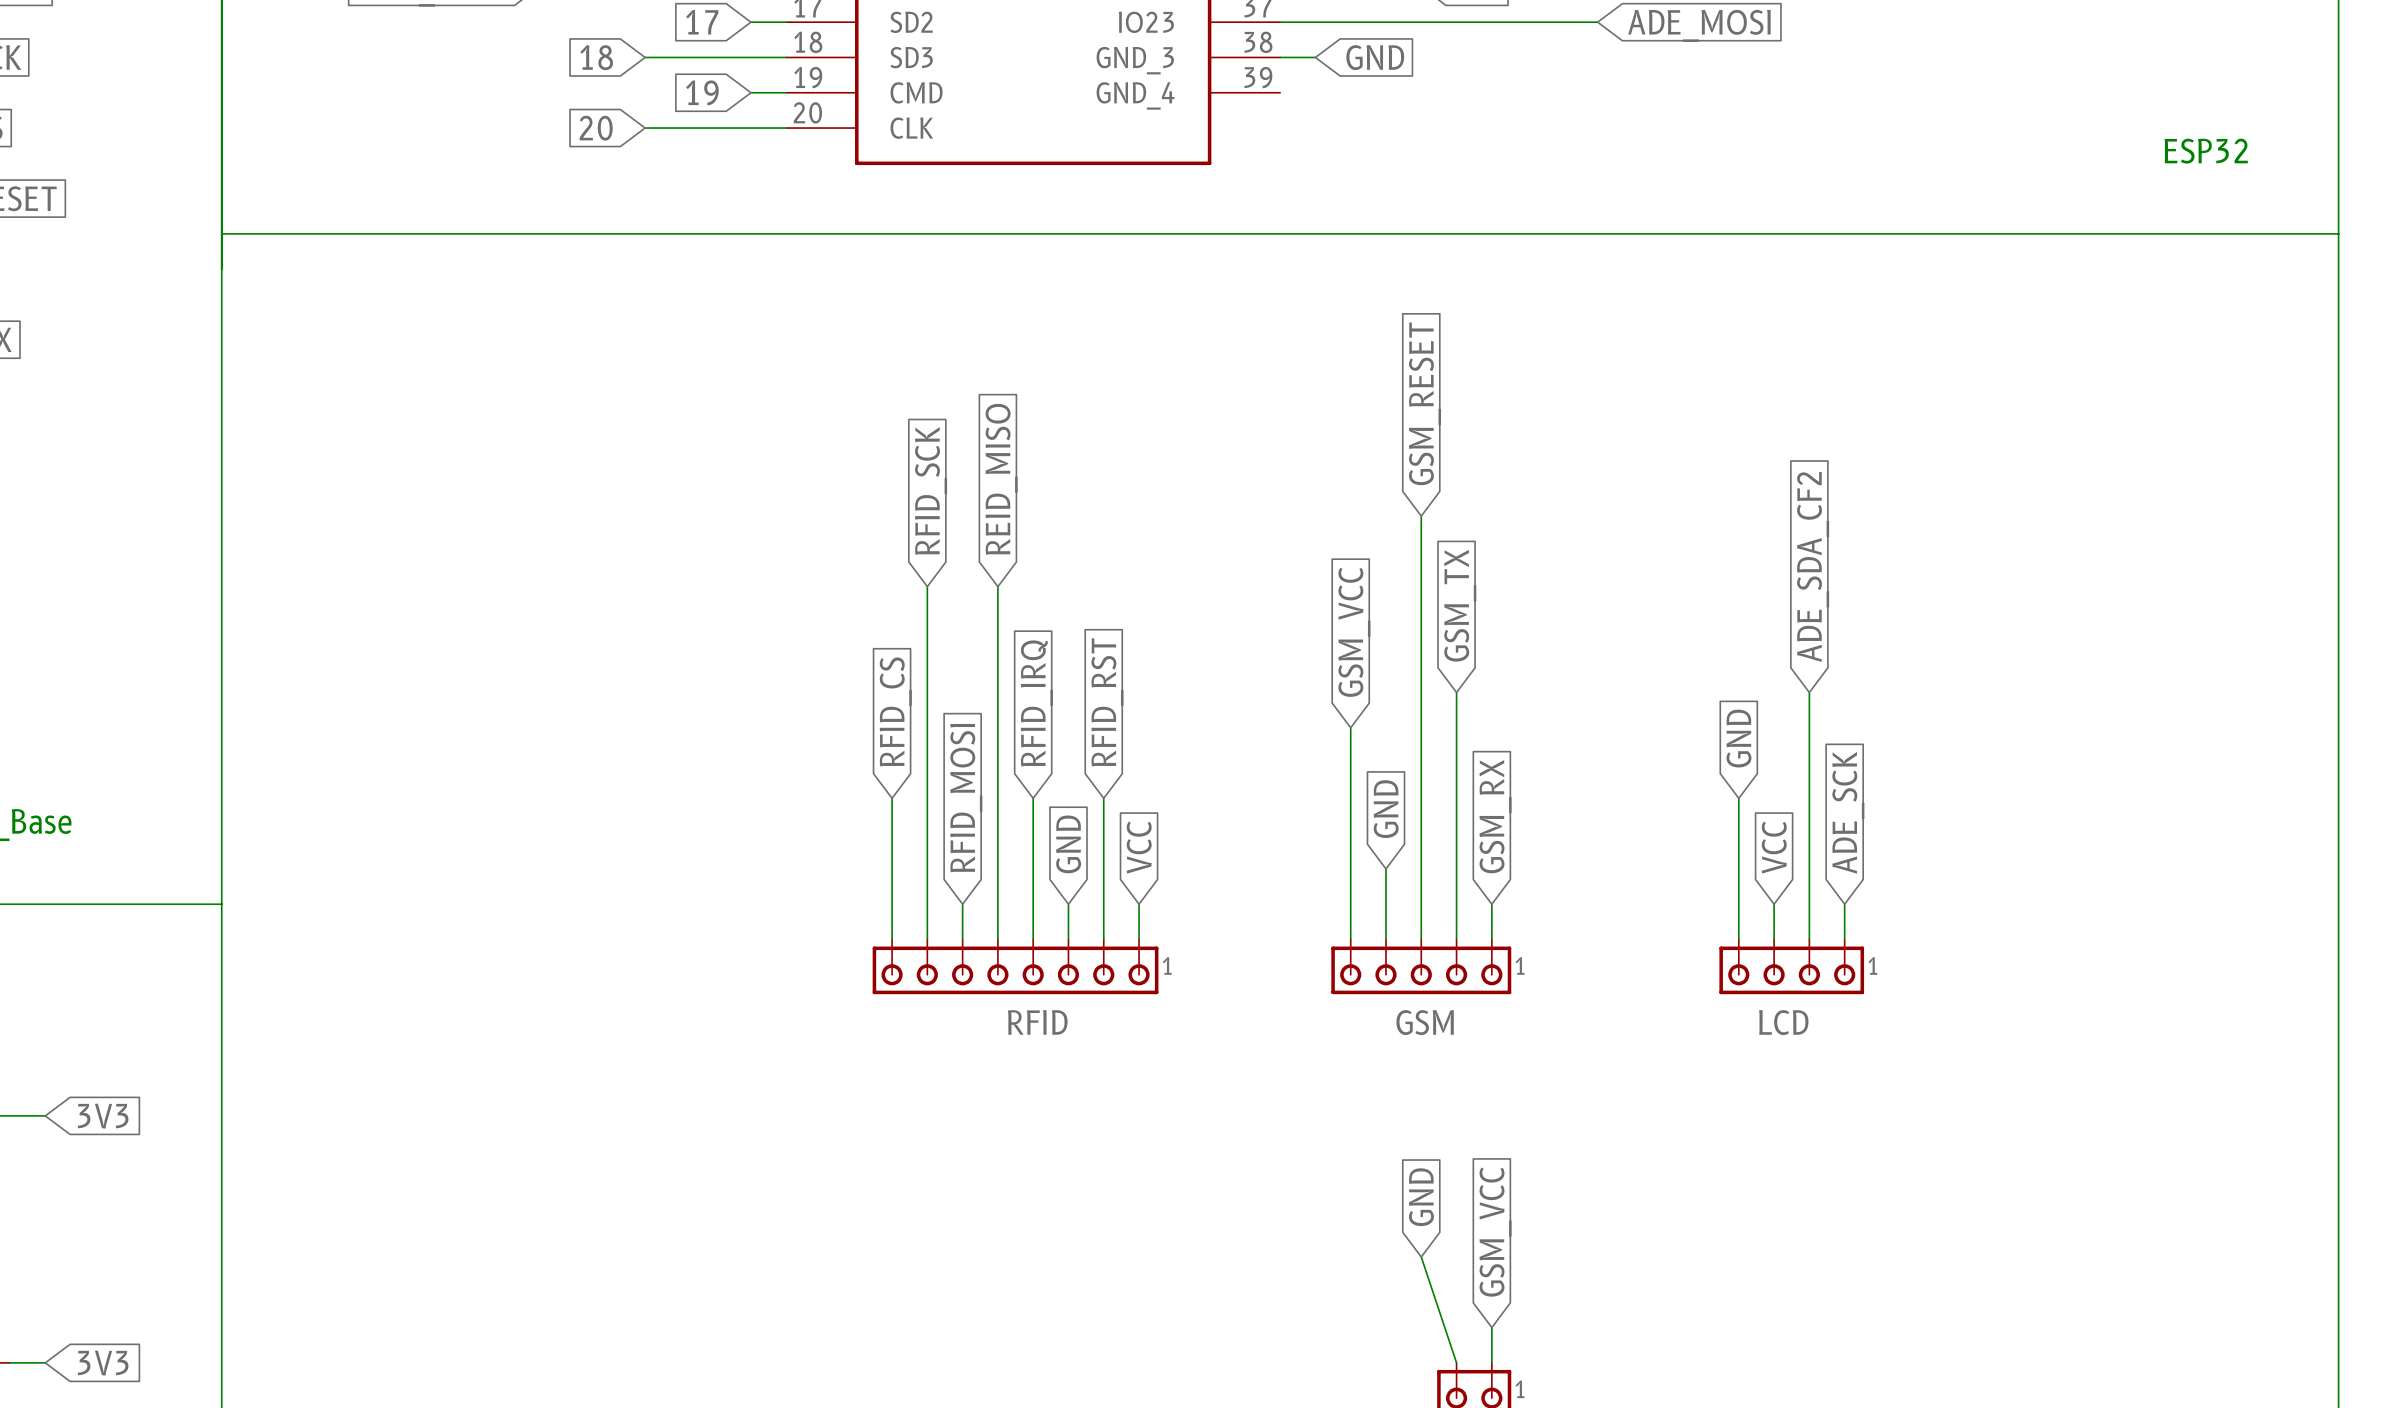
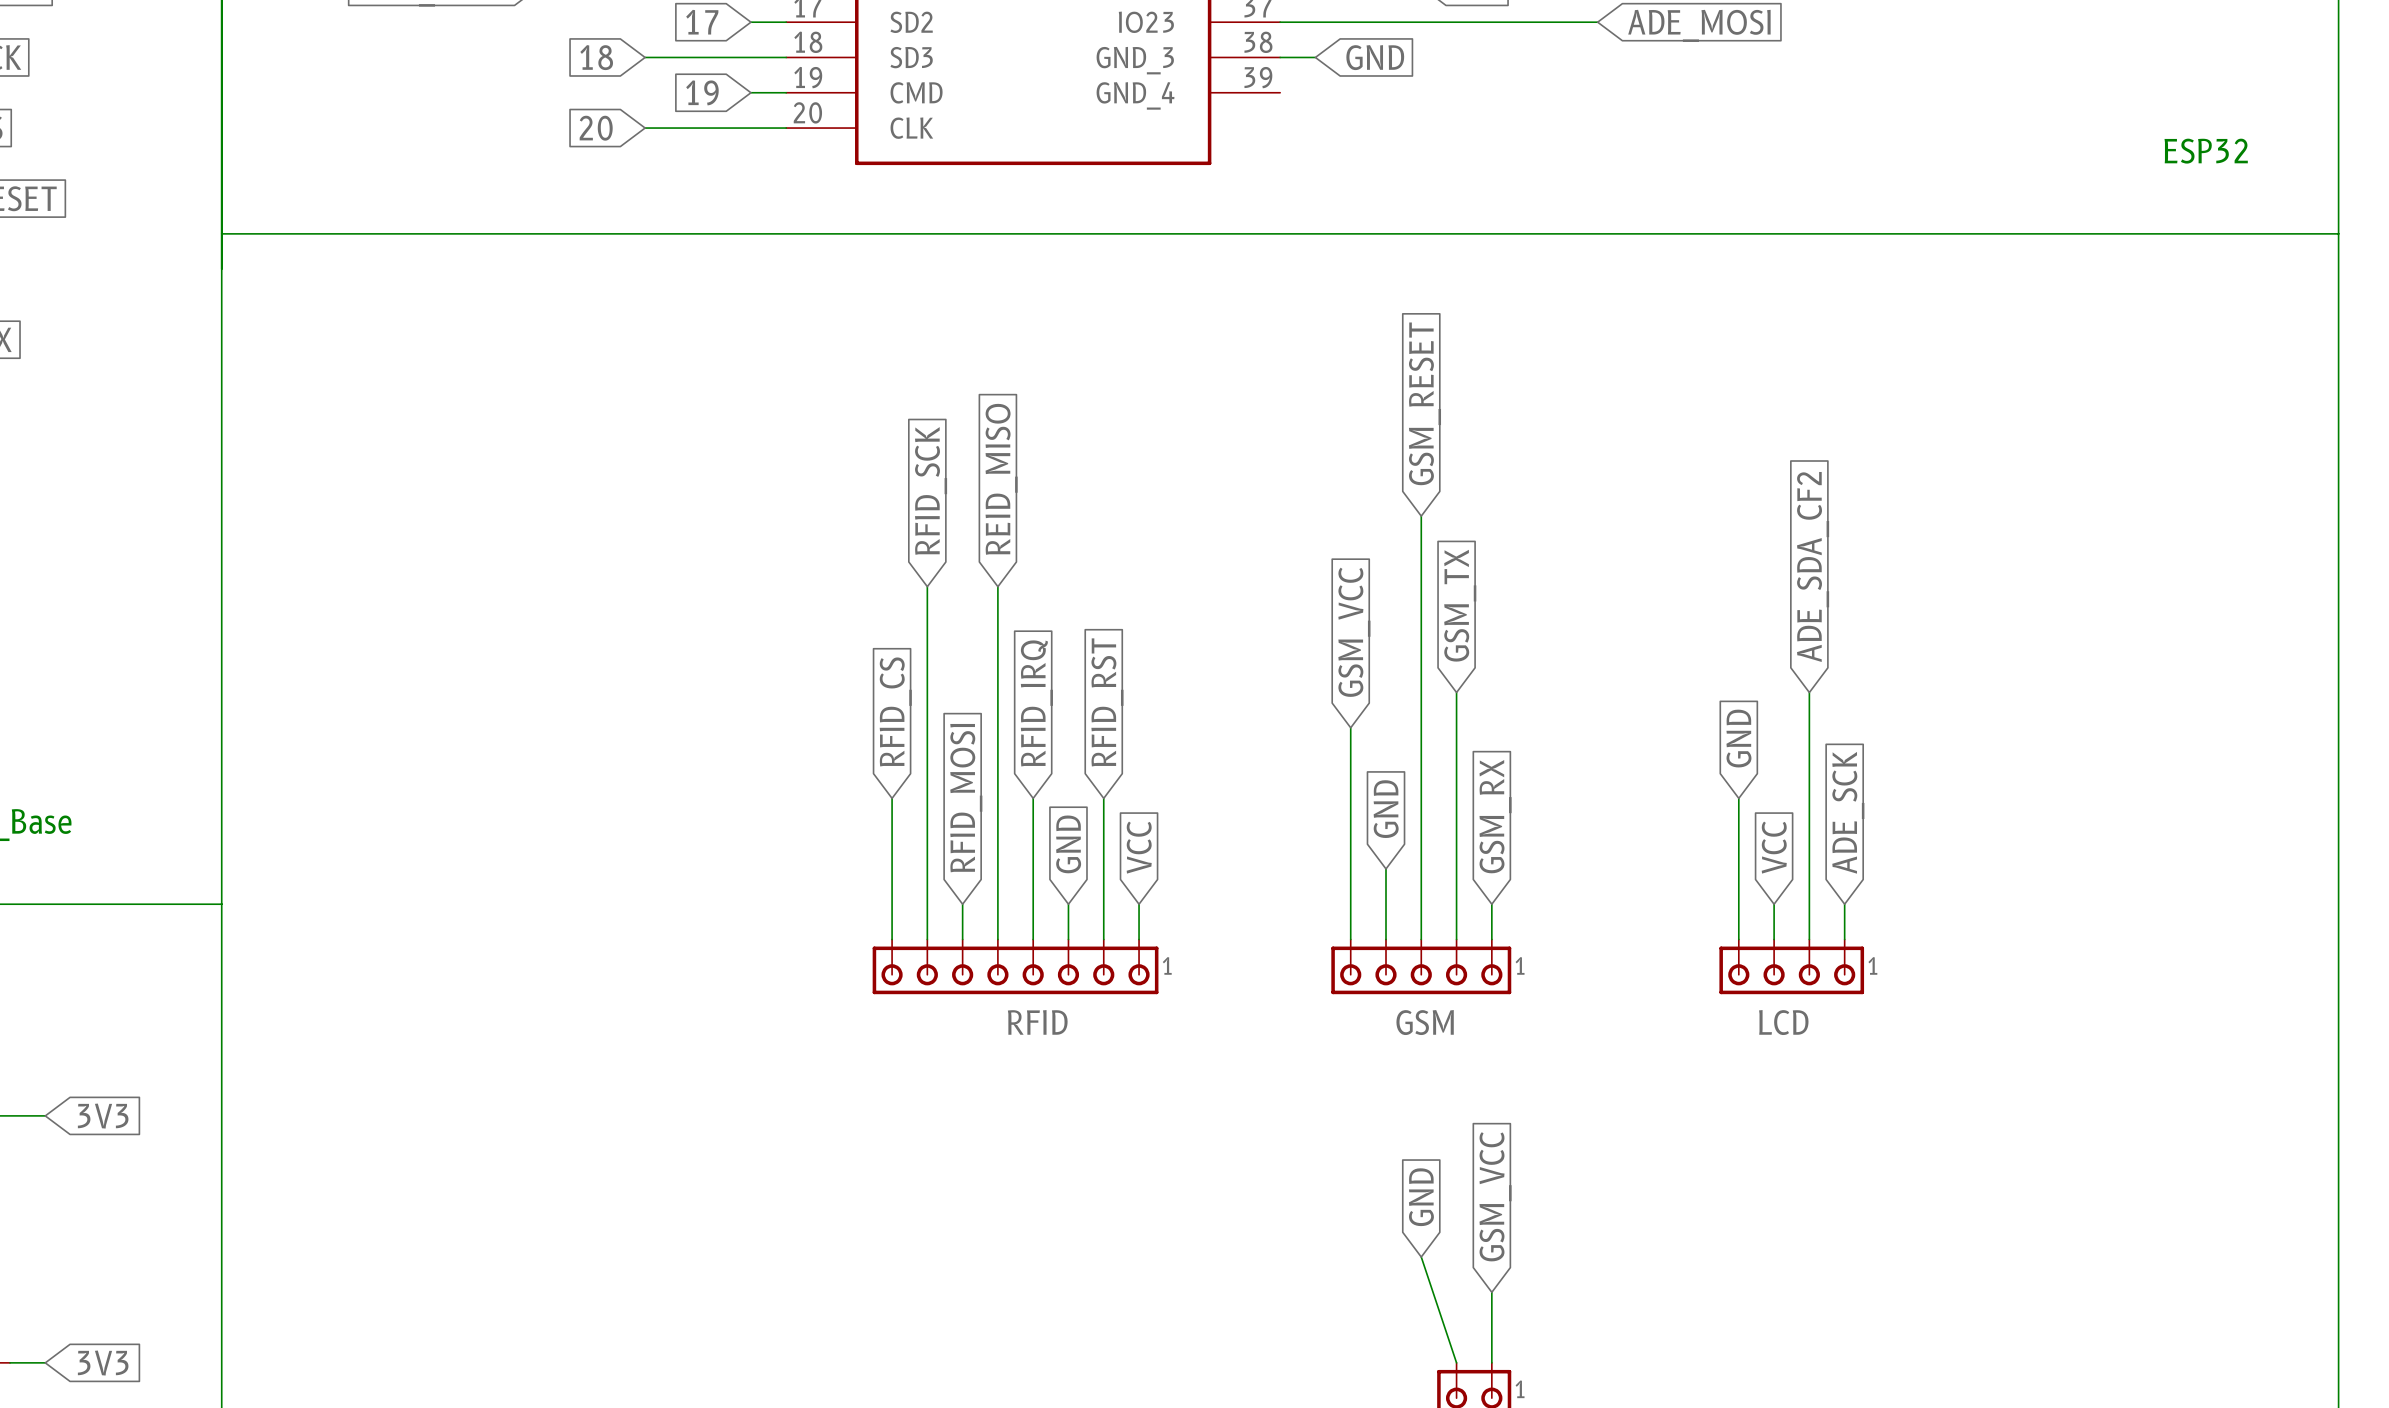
global label position: GSM_VCC (1495, 1232) -> GSM_VCC (1495, 1196)
wire: none -> (1491, 1292) (1491, 1327)

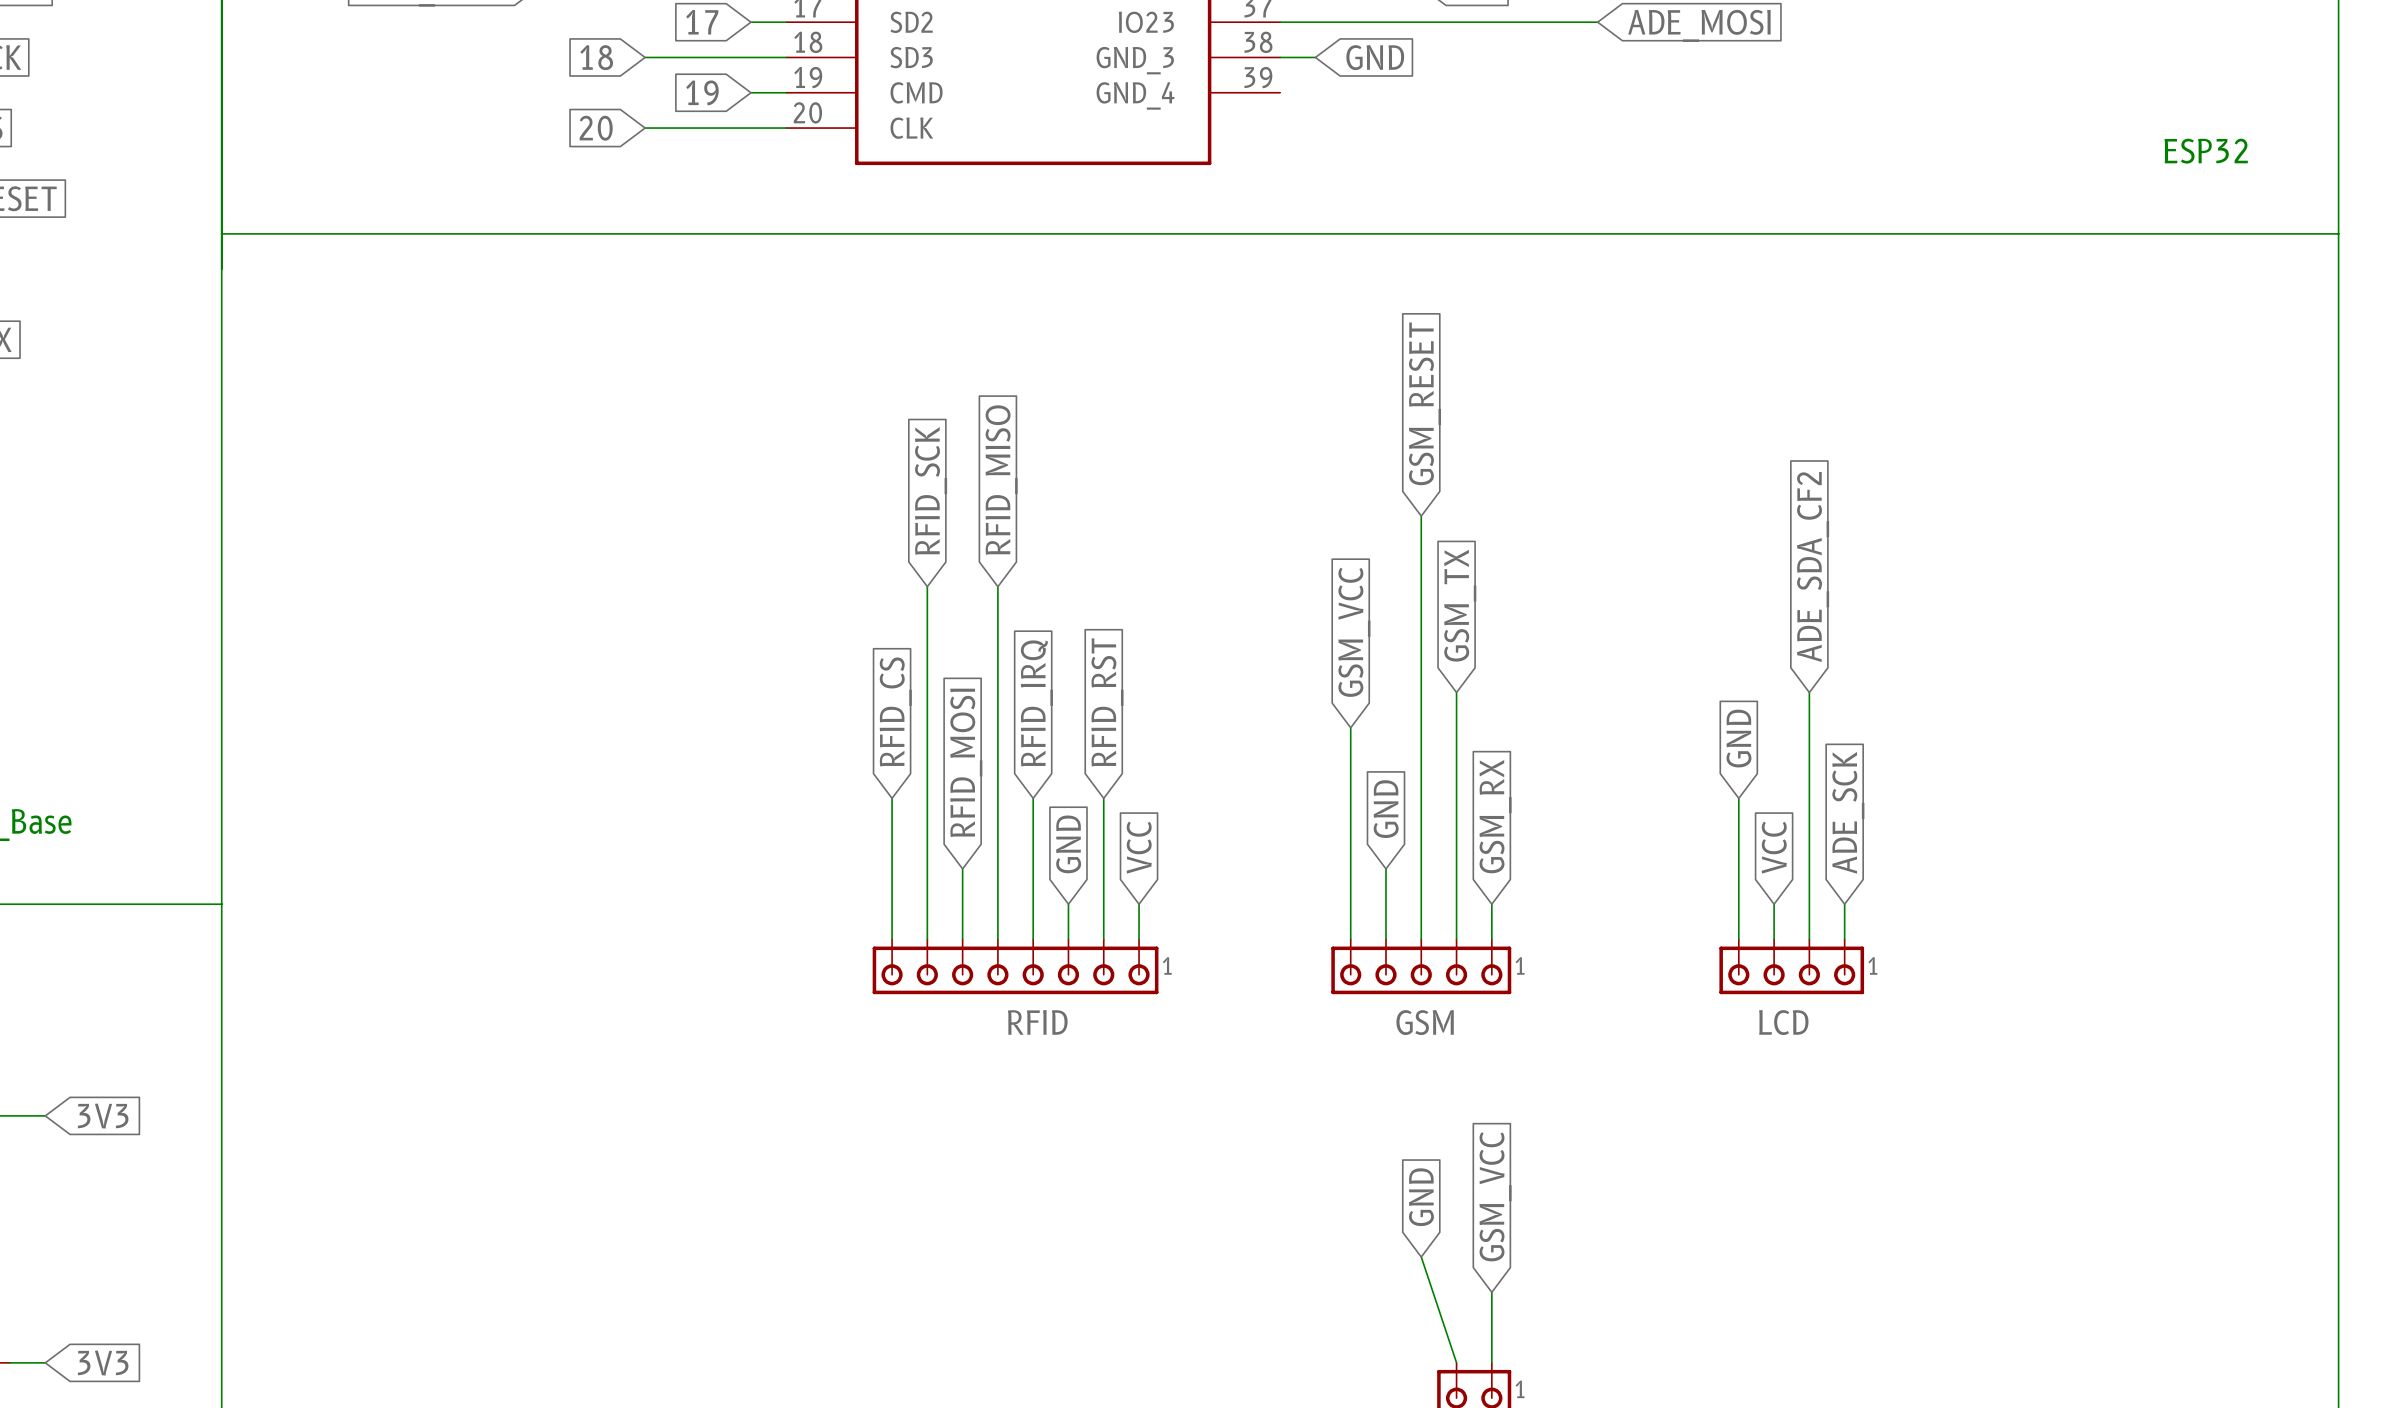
global label: REID_MISO (1001, 479) -> RFID_MISO (1001, 480)
global label position: RFID_MOSI (966, 798) -> RFID_MOSI (966, 762)
wire: none -> (962, 868) (962, 904)

